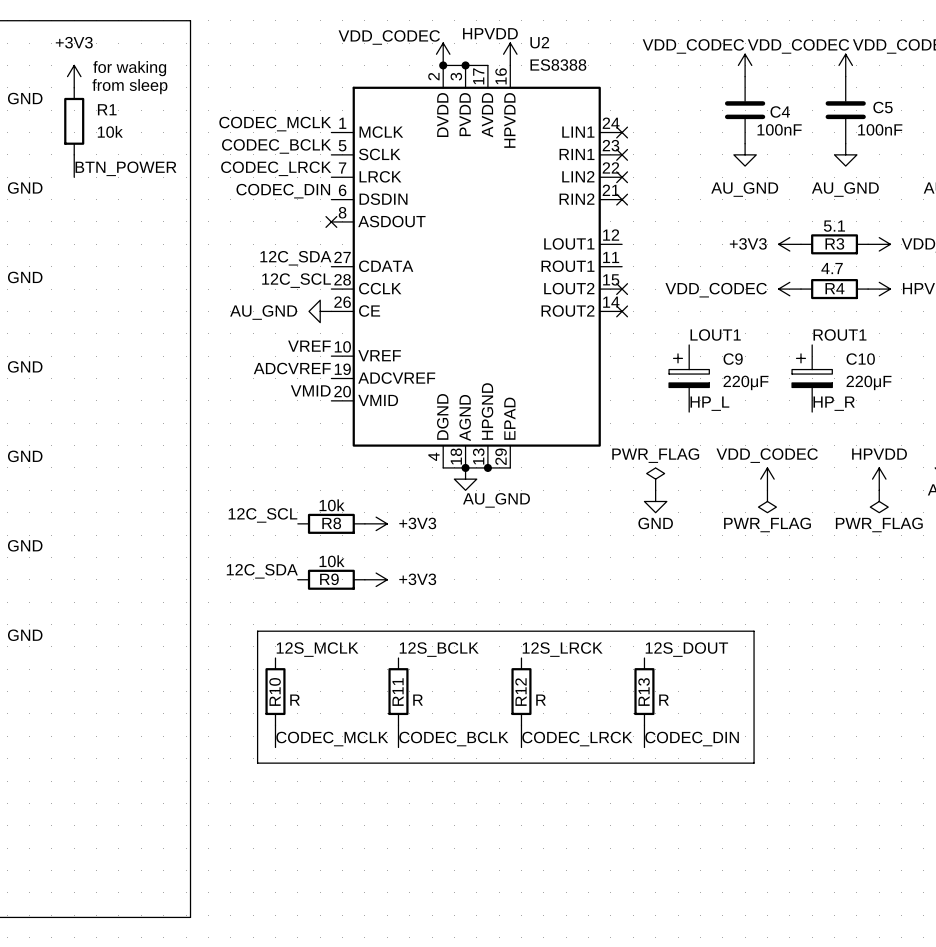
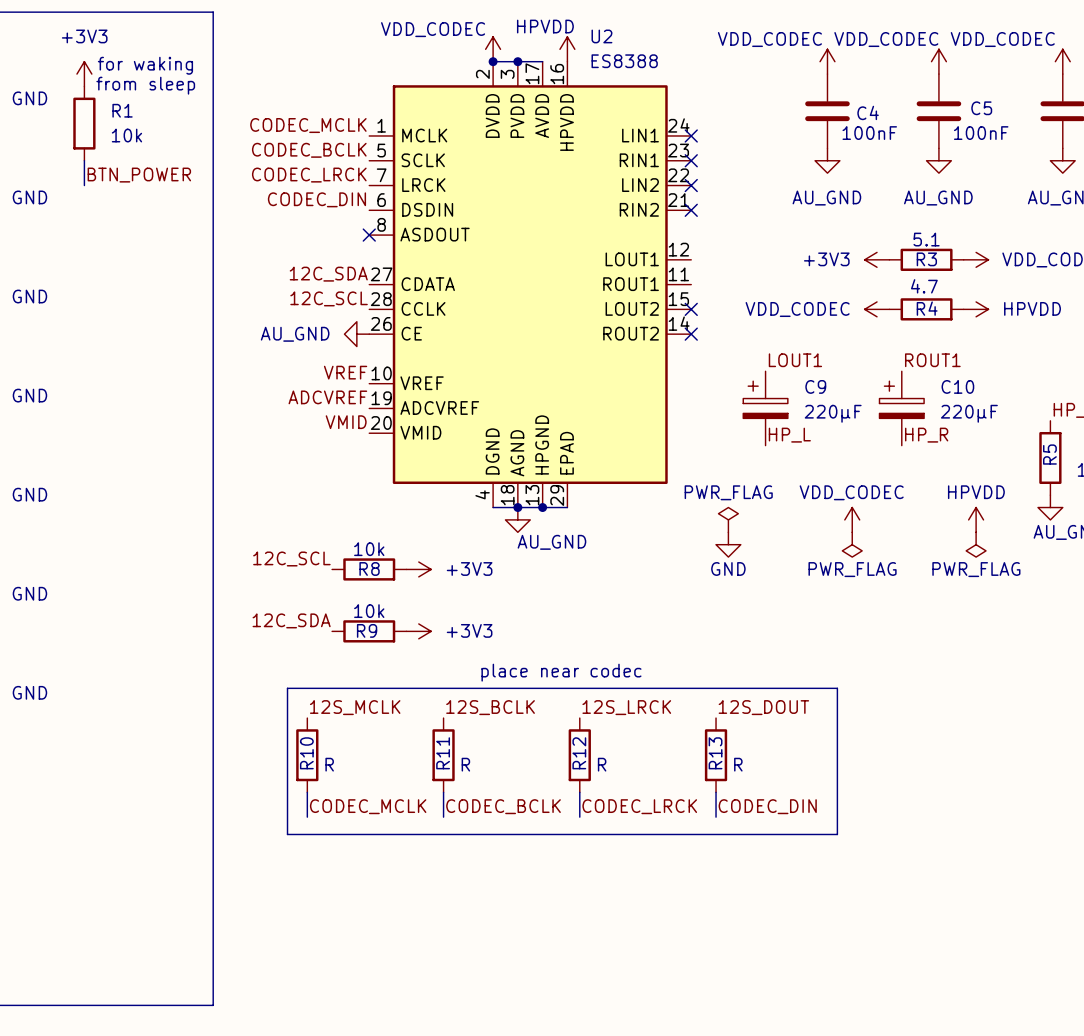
text: none -> place near codec (561, 672)

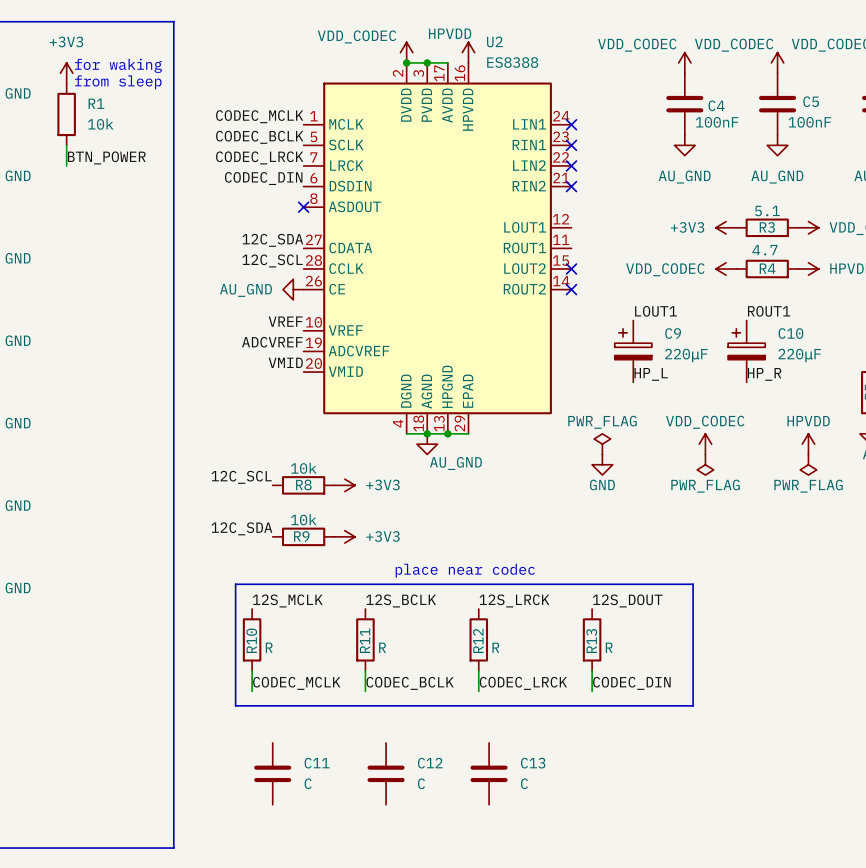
C11: none -> C (272, 773)
C12: none -> C (386, 773)
C13: none -> C (489, 773)

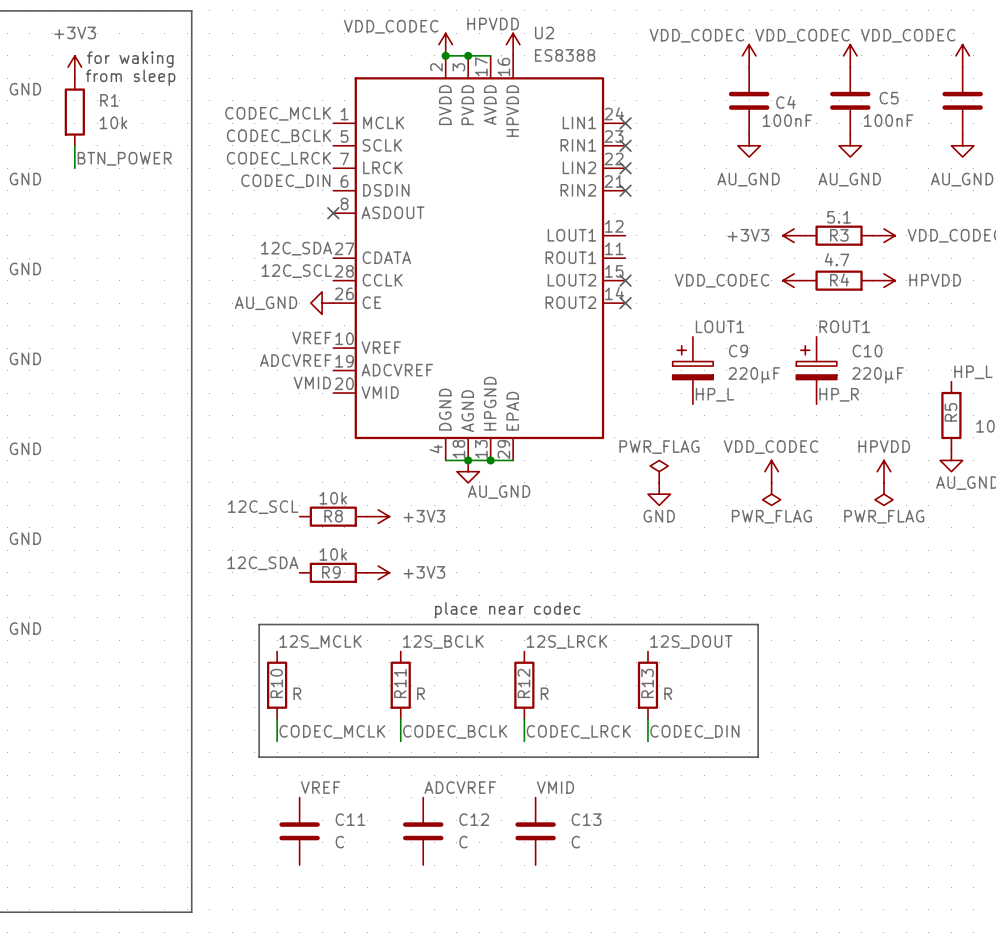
label: none -> VREF (320, 787)
label: none -> ADCVREF (460, 787)
label: none -> VMID (555, 787)

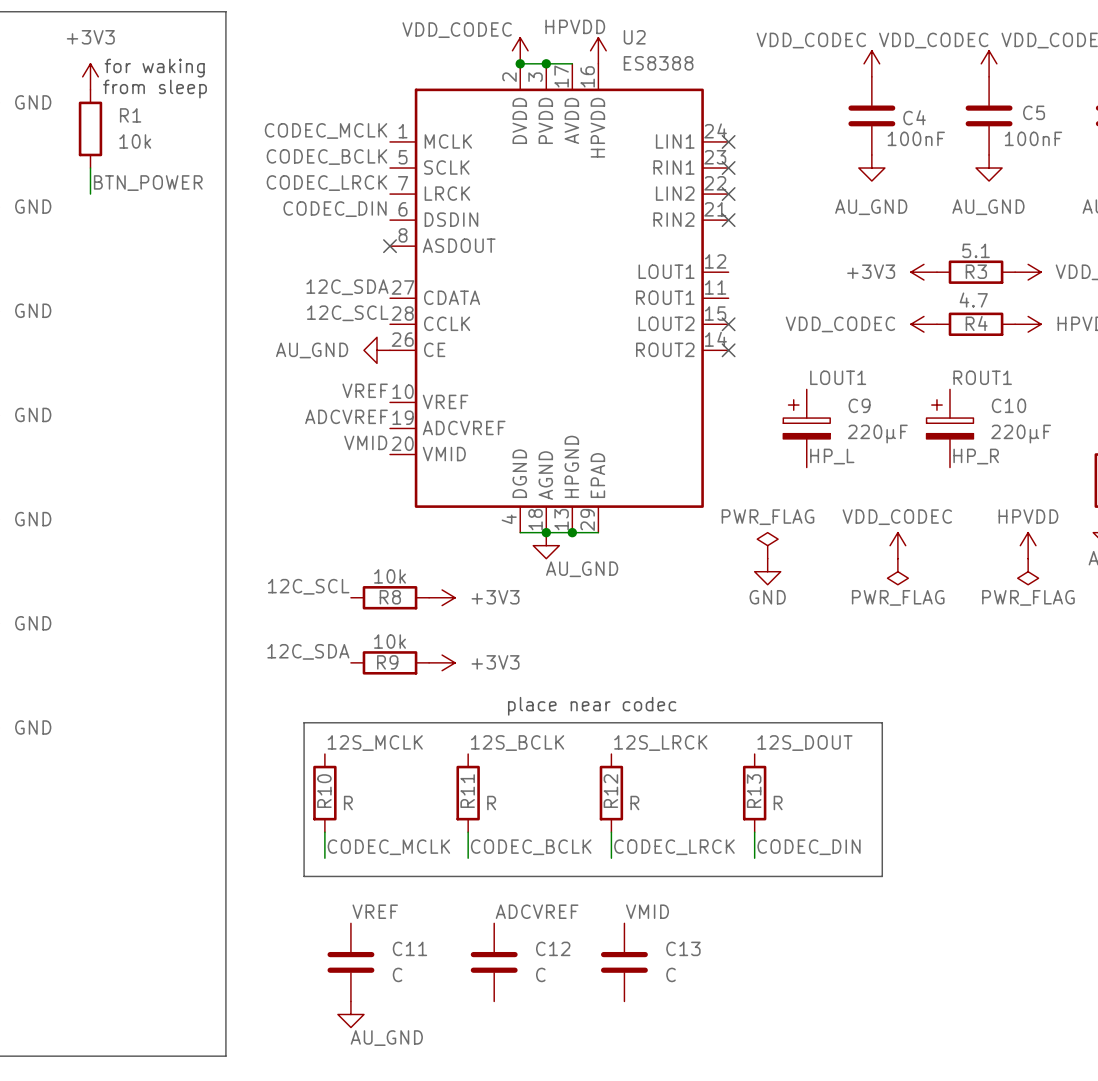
power symbol: none -> AU_GND (350, 1014)

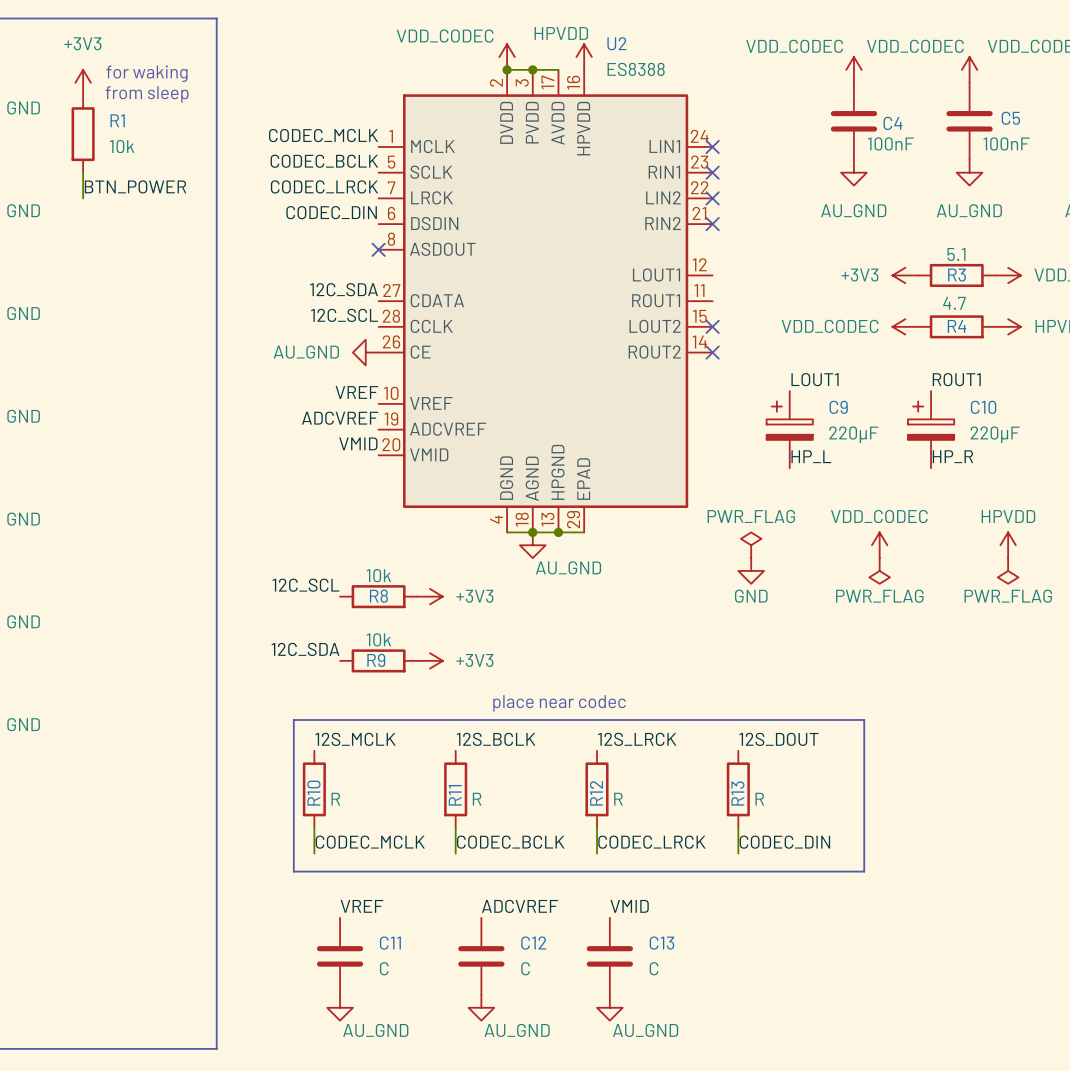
power symbol: none -> AU_GND (481, 1007)
power symbol: none -> AU_GND (609, 1007)

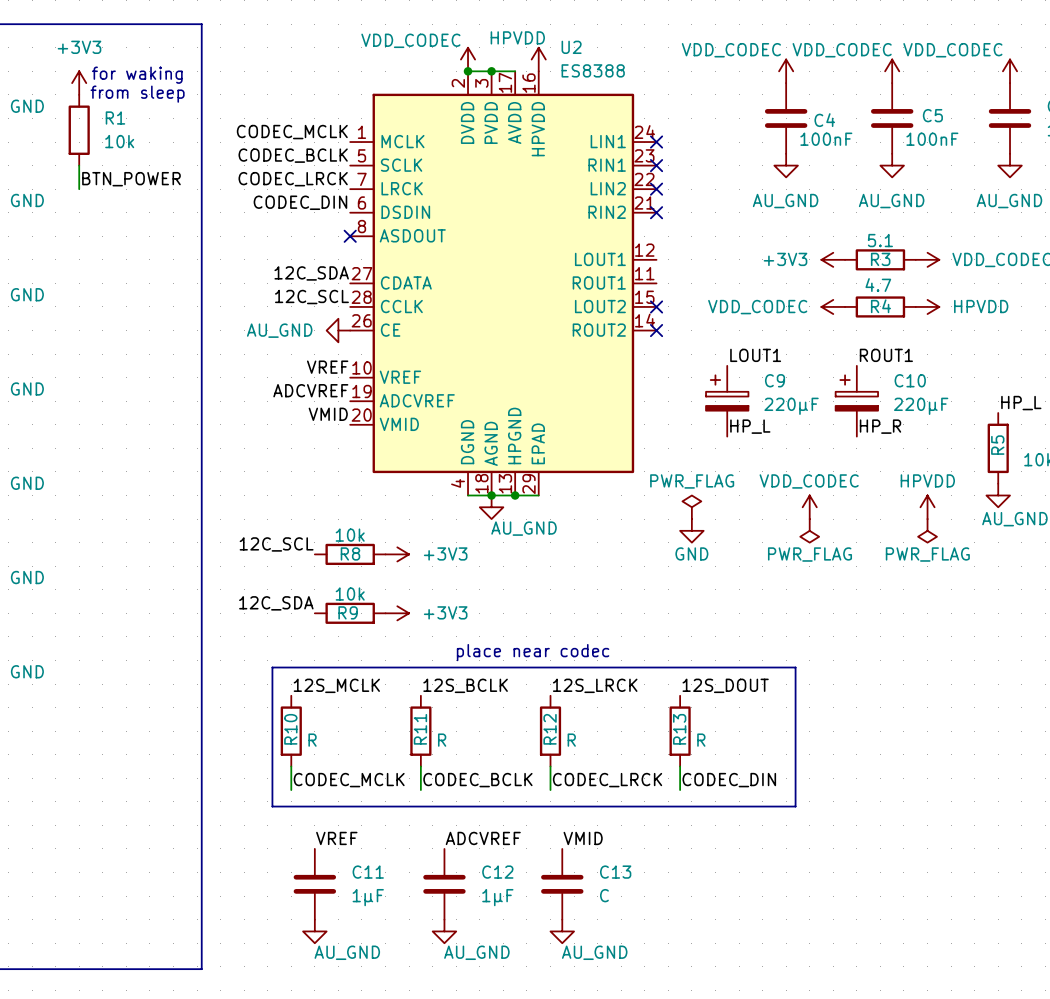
C11 value: C (384, 968) -> 1μF (368, 897)
C12 value: C (525, 968) -> 1μF (497, 897)

